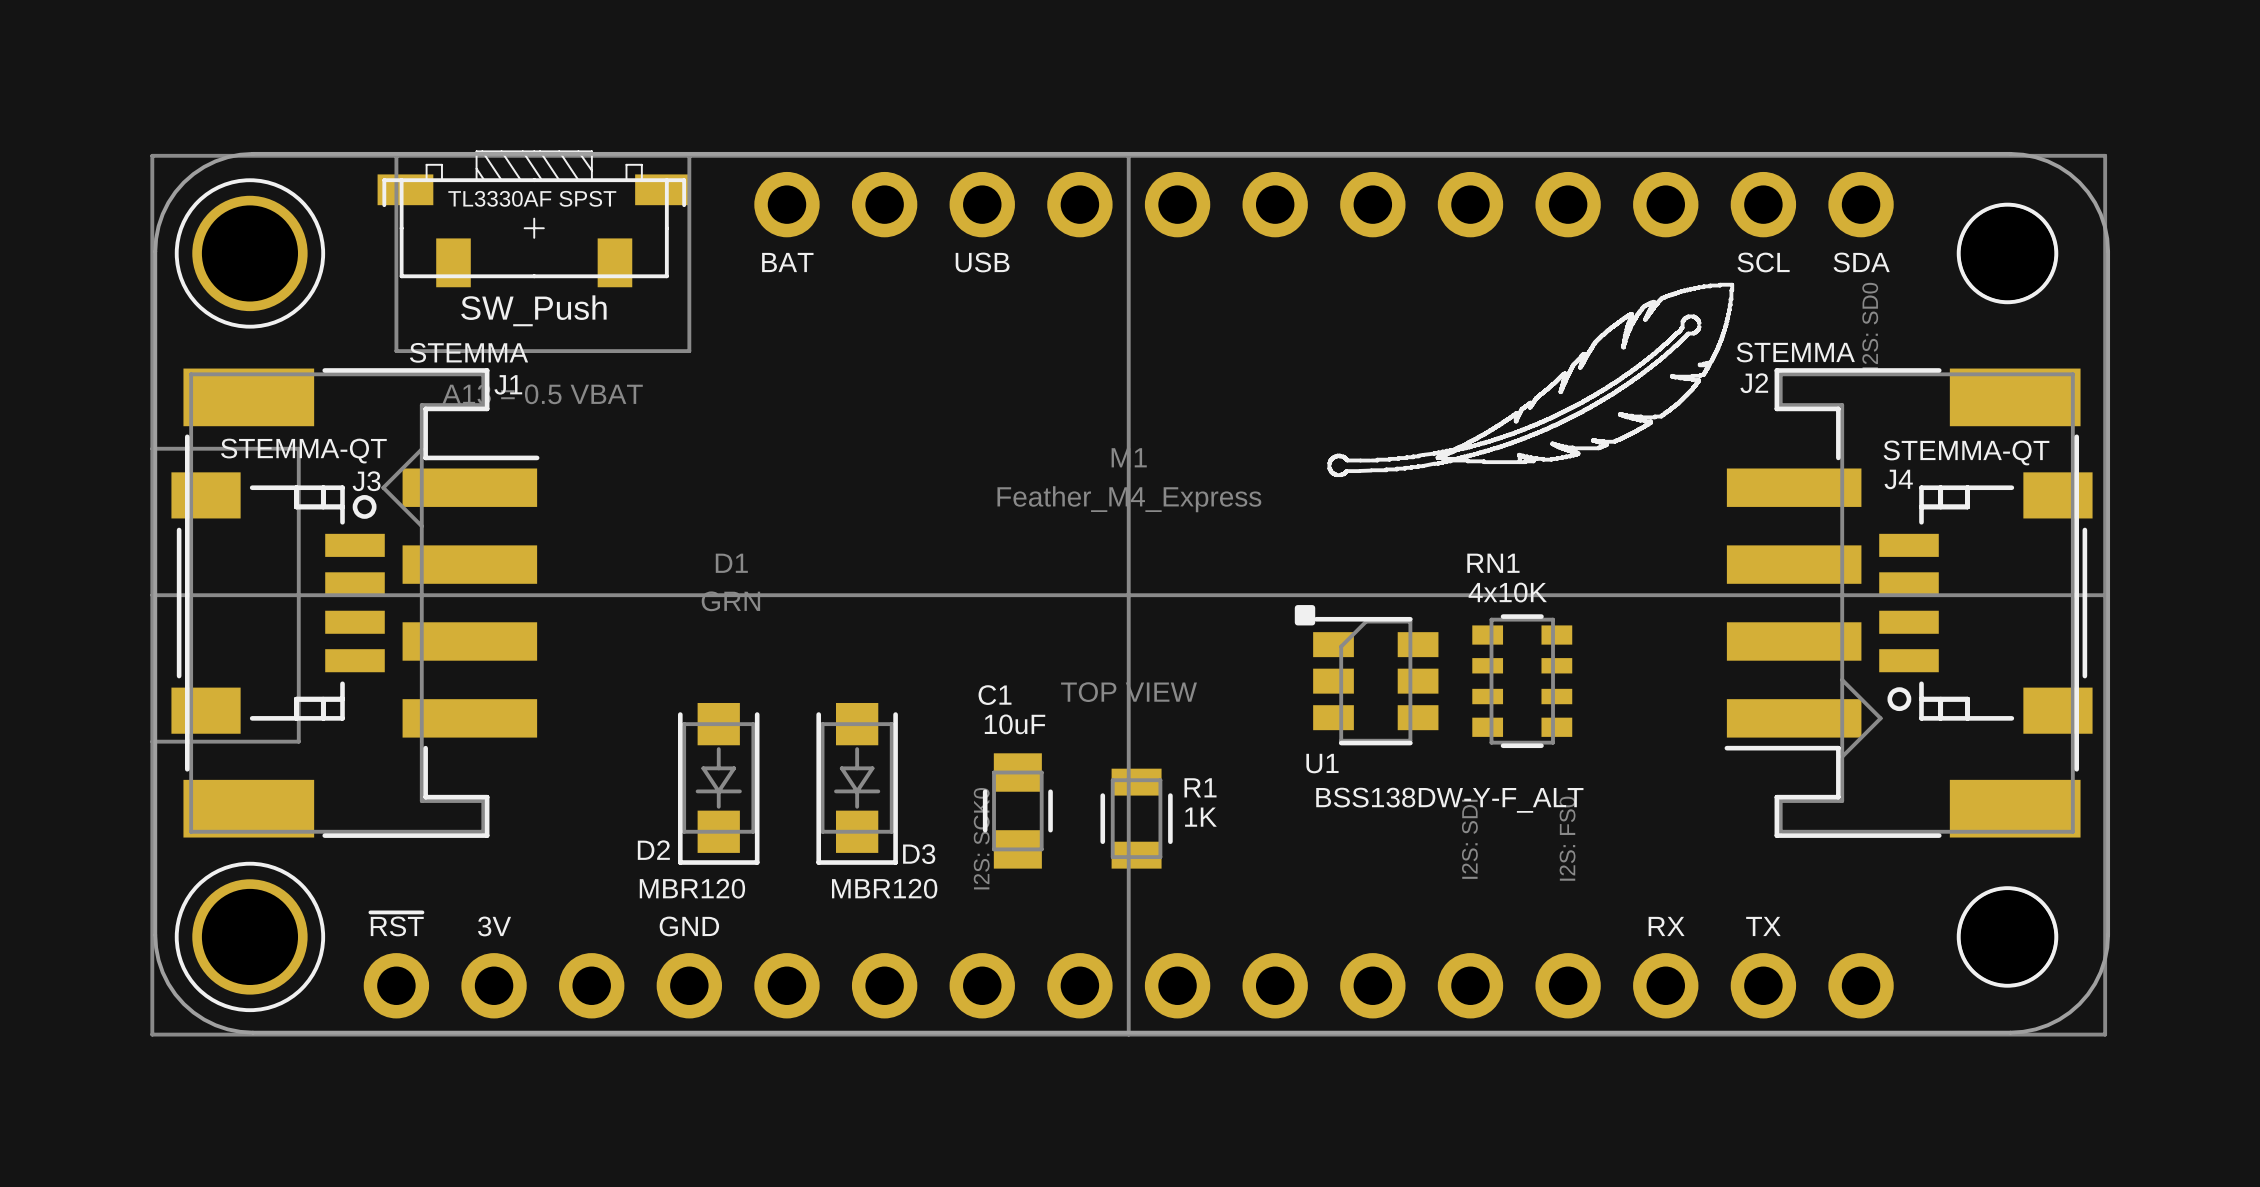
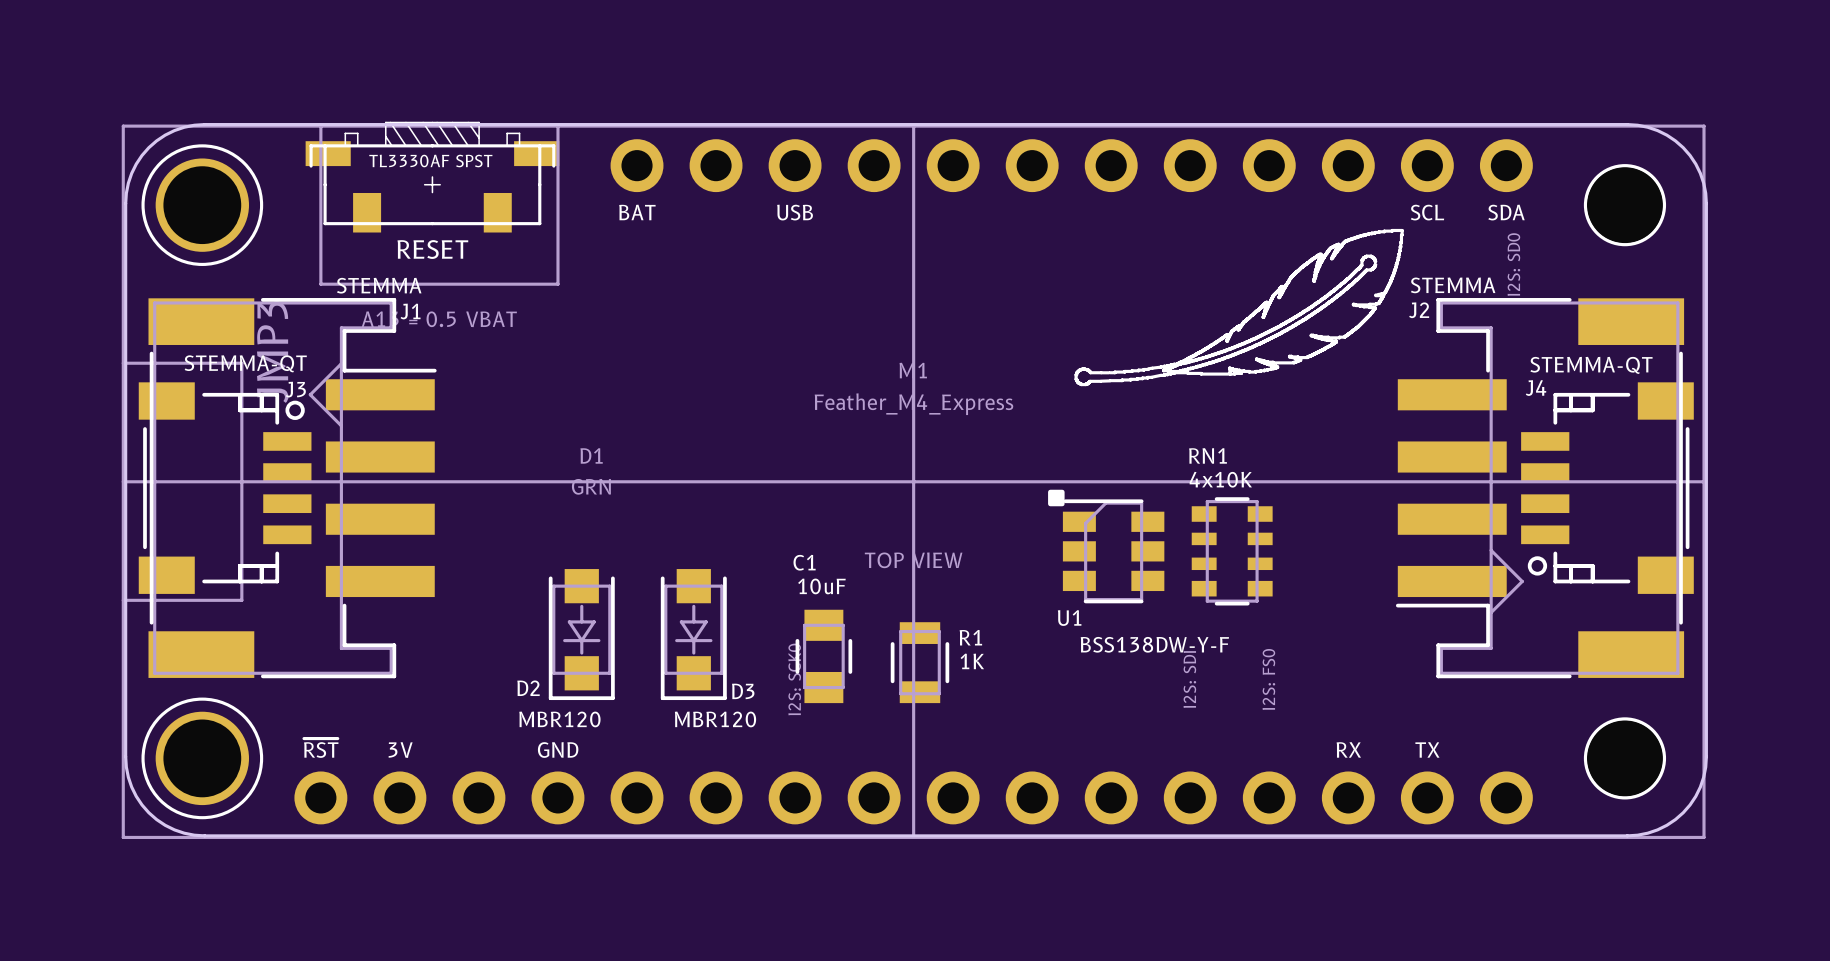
part value: SW_Push (533, 310) -> RESET (432, 249)
JMP3: none -> (272, 352)
U1 value: BSS138DW-Y-F_ALT (1449, 800) -> BSS138DW-Y-F (1154, 644)

